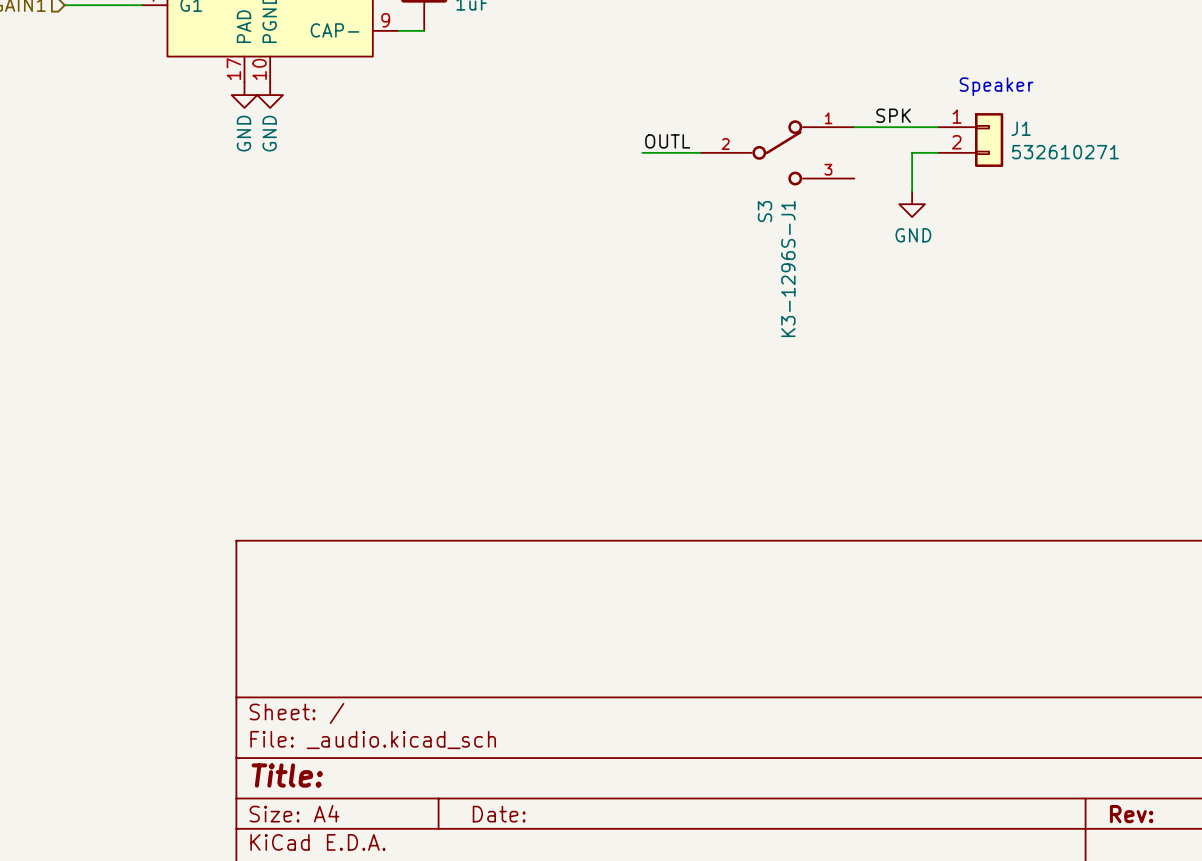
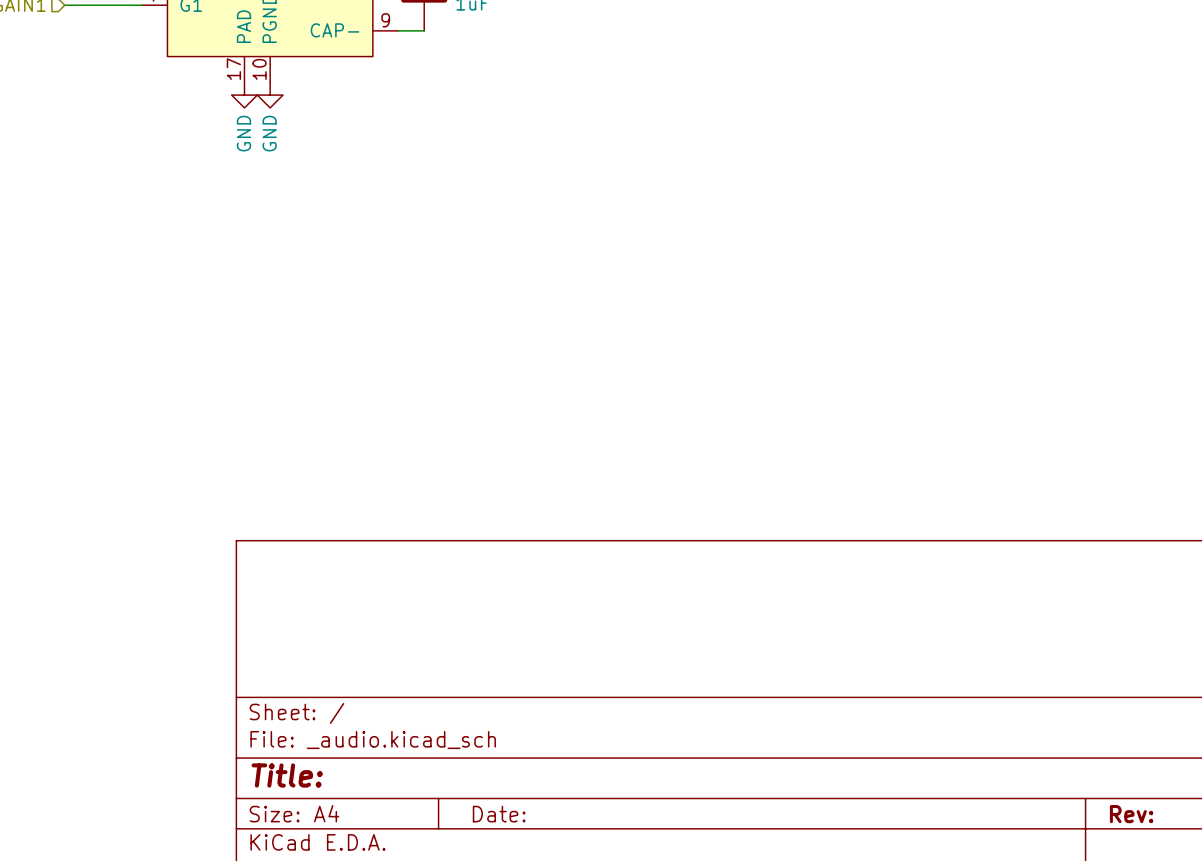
text: Speaker (996, 86) -> none
label: SPK (893, 115) -> none
wire: (854, 127) (937, 127) -> none
J1: 532610271 (970, 140) -> none
label: OUTL (667, 141) -> none
wire: (642, 152) (700, 152) -> none
S3: K3-1296S-J1 (777, 152) -> none
wire: (937, 152) (912, 152) (912, 191) -> none
power symbol: GND (912, 204) -> none

